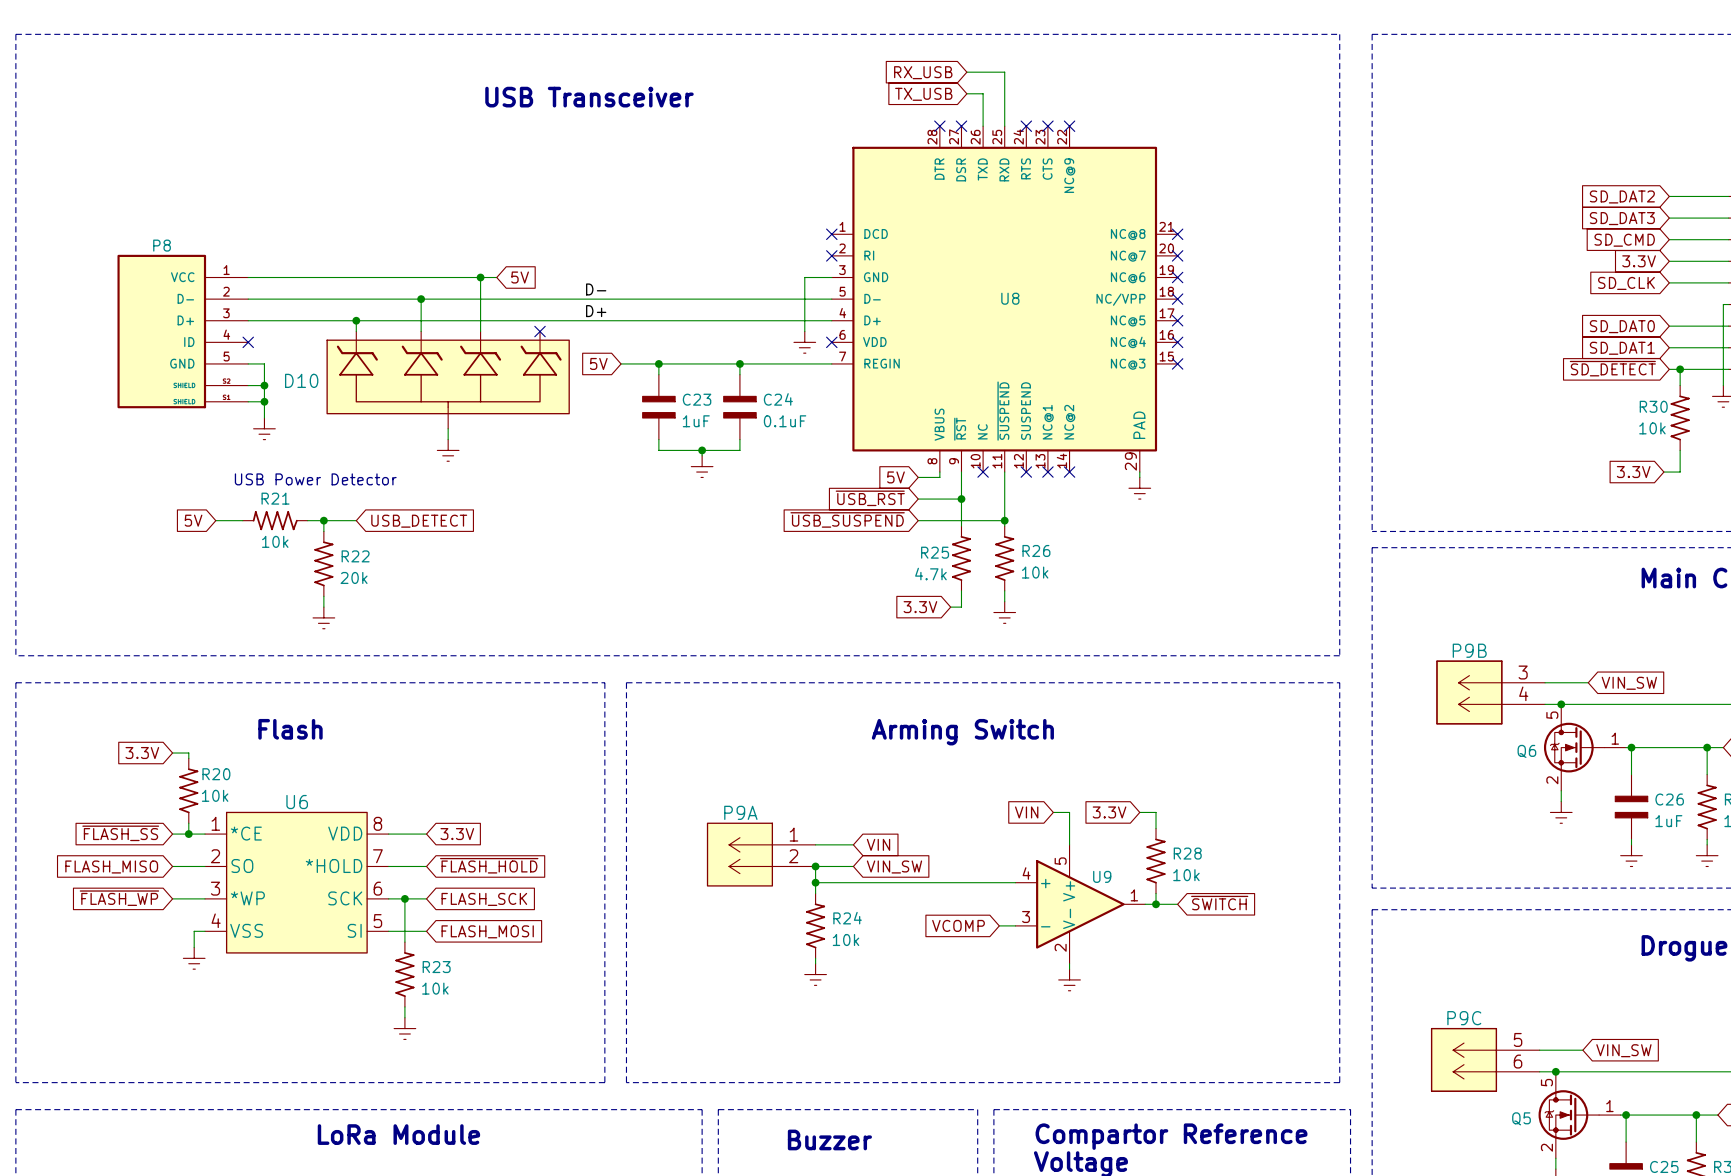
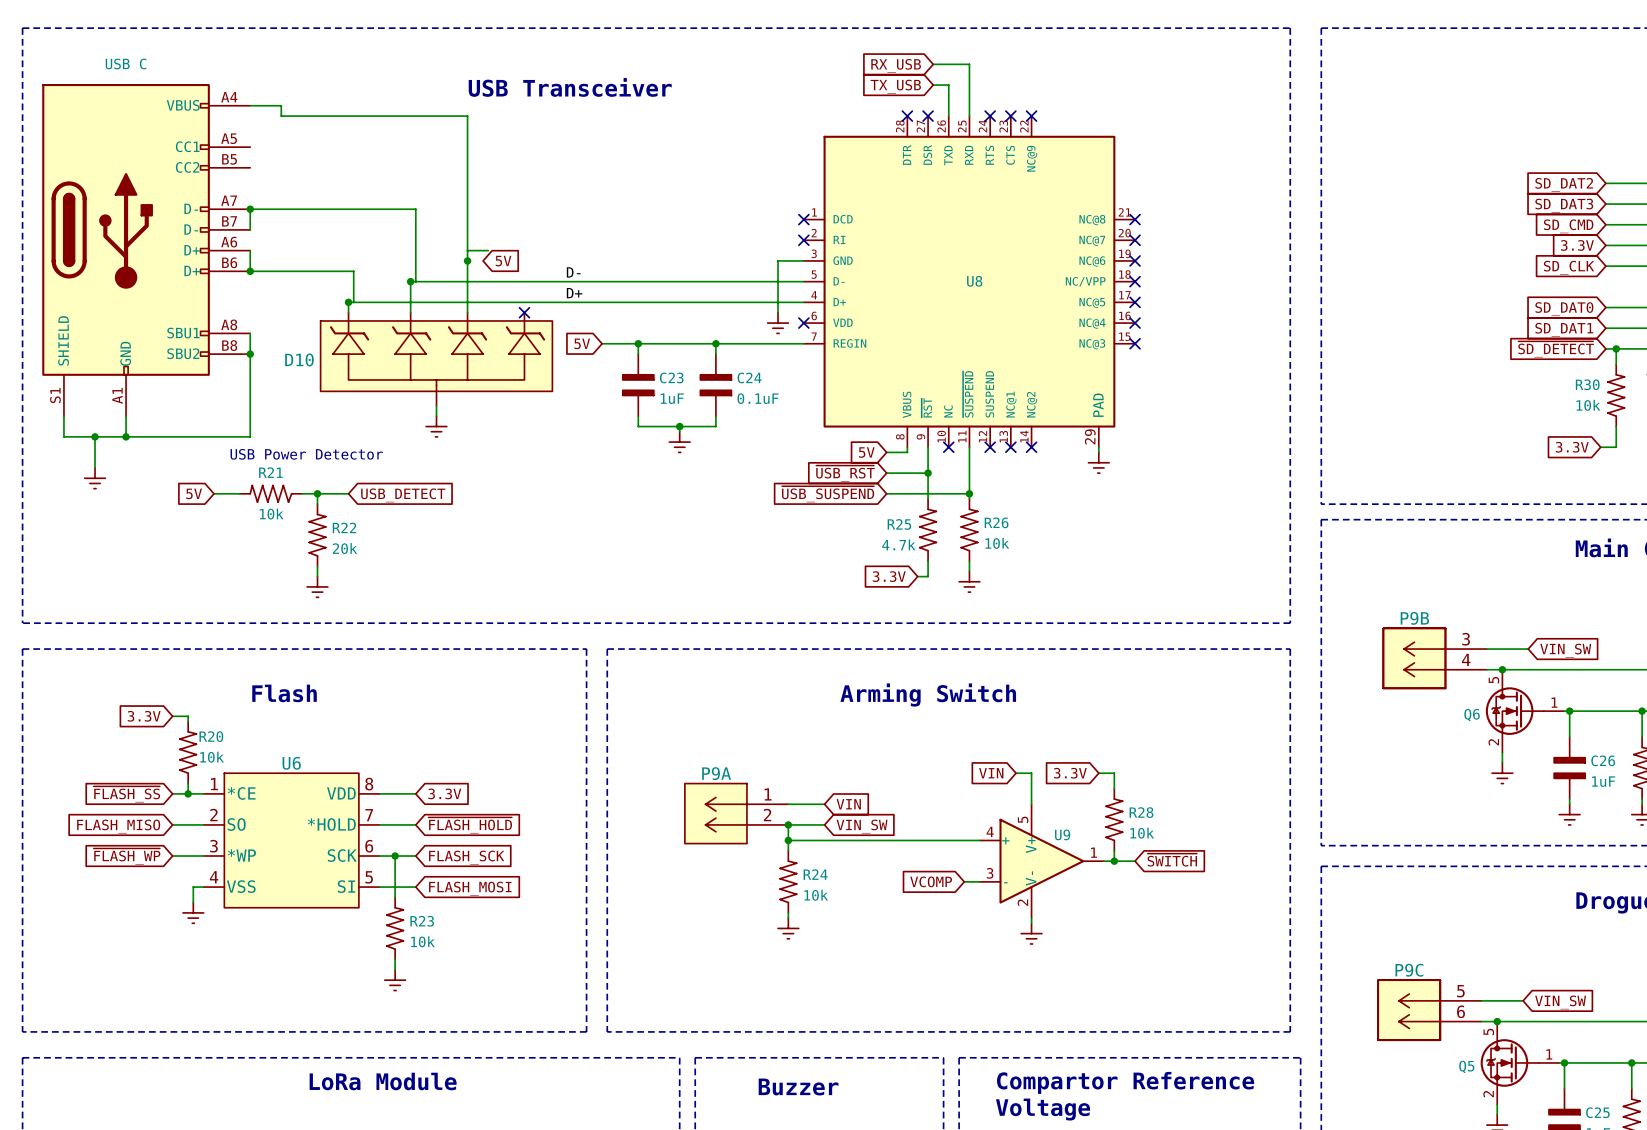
wire: none -> (250, 105) (281, 105) (281, 116) (467, 116) (467, 260)
junction: none -> (250, 209)
wire: none -> (250, 229) (250, 209) (415, 209) (415, 281)
part: none -> USB C (146, 250)
wire: none -> (250, 250) (250, 271) (353, 271) (353, 302)
wire: none -> (467, 250) (488, 250)
wire: (248, 277) (496, 277) -> none
junction: none -> (250, 271)
wire: (248, 299) (421, 299) -> none
wire: (248, 320) (356, 320) -> none
P8: (182, 331) -> none
no-connect mark: (248, 342) -> none
wire: none -> (250, 333) (250, 436) (63, 436) (63, 416)
wire: (248, 363) (264, 363) (264, 418) -> none
junction: none -> (250, 354)
wire: (248, 385) (264, 385) -> none
junction: (264, 385) -> none
wire: (248, 401) (264, 401) -> none
junction: (264, 401) -> none
power symbol position: (264, 428) -> (95, 478)
wire: none -> (126, 416) (126, 436)
wire: none -> (95, 436) (95, 467)
junction: none -> (95, 436)
junction: none -> (126, 436)

